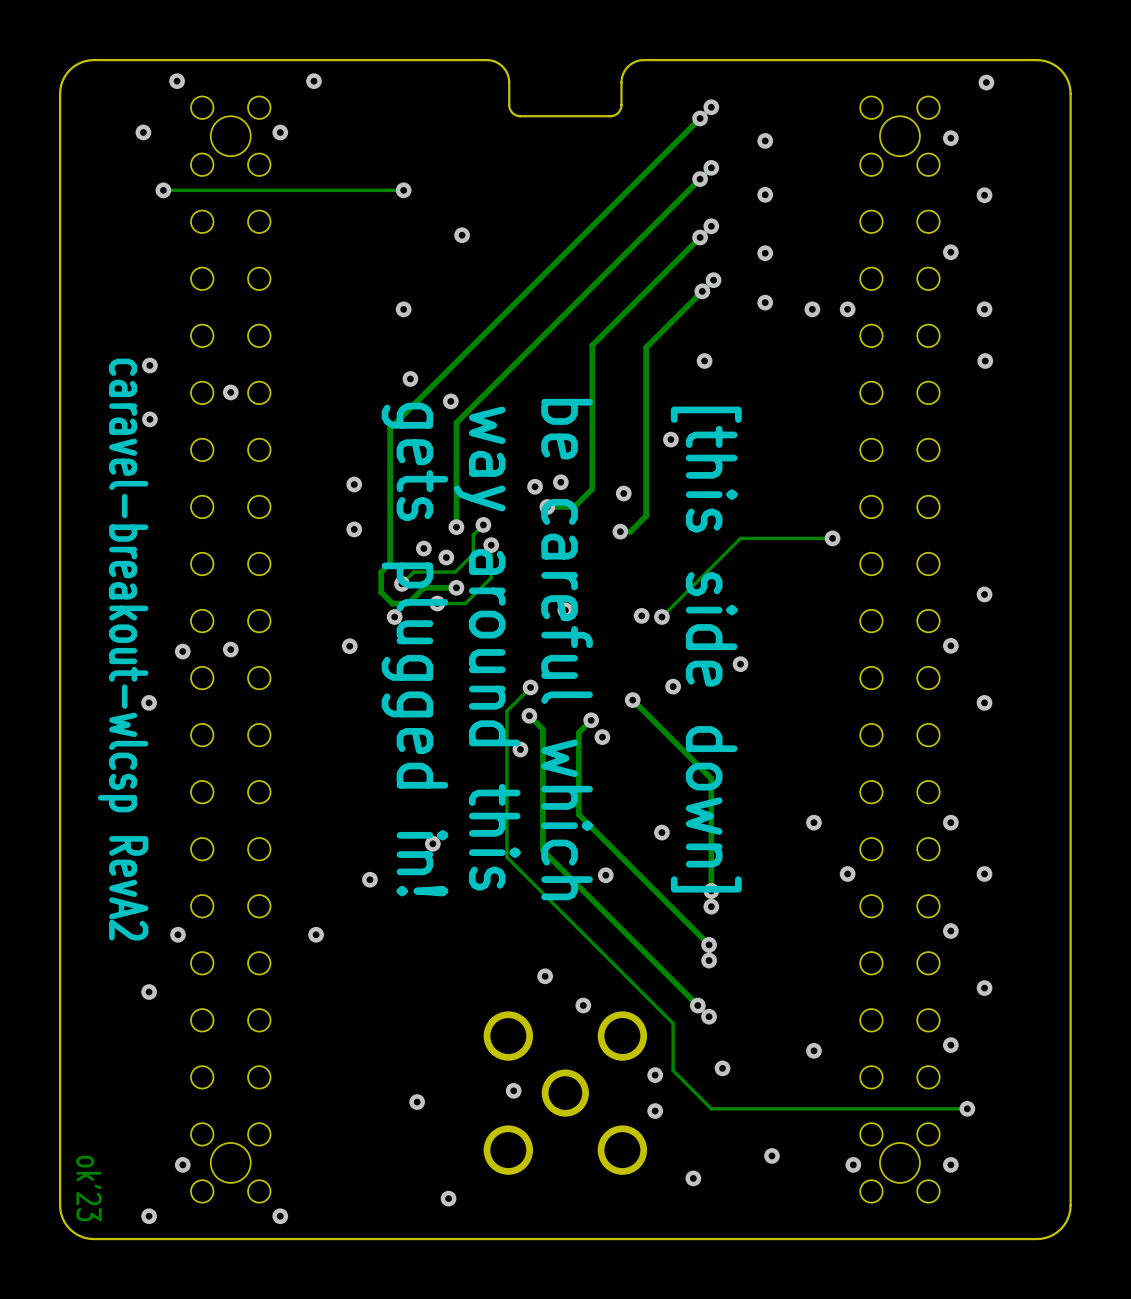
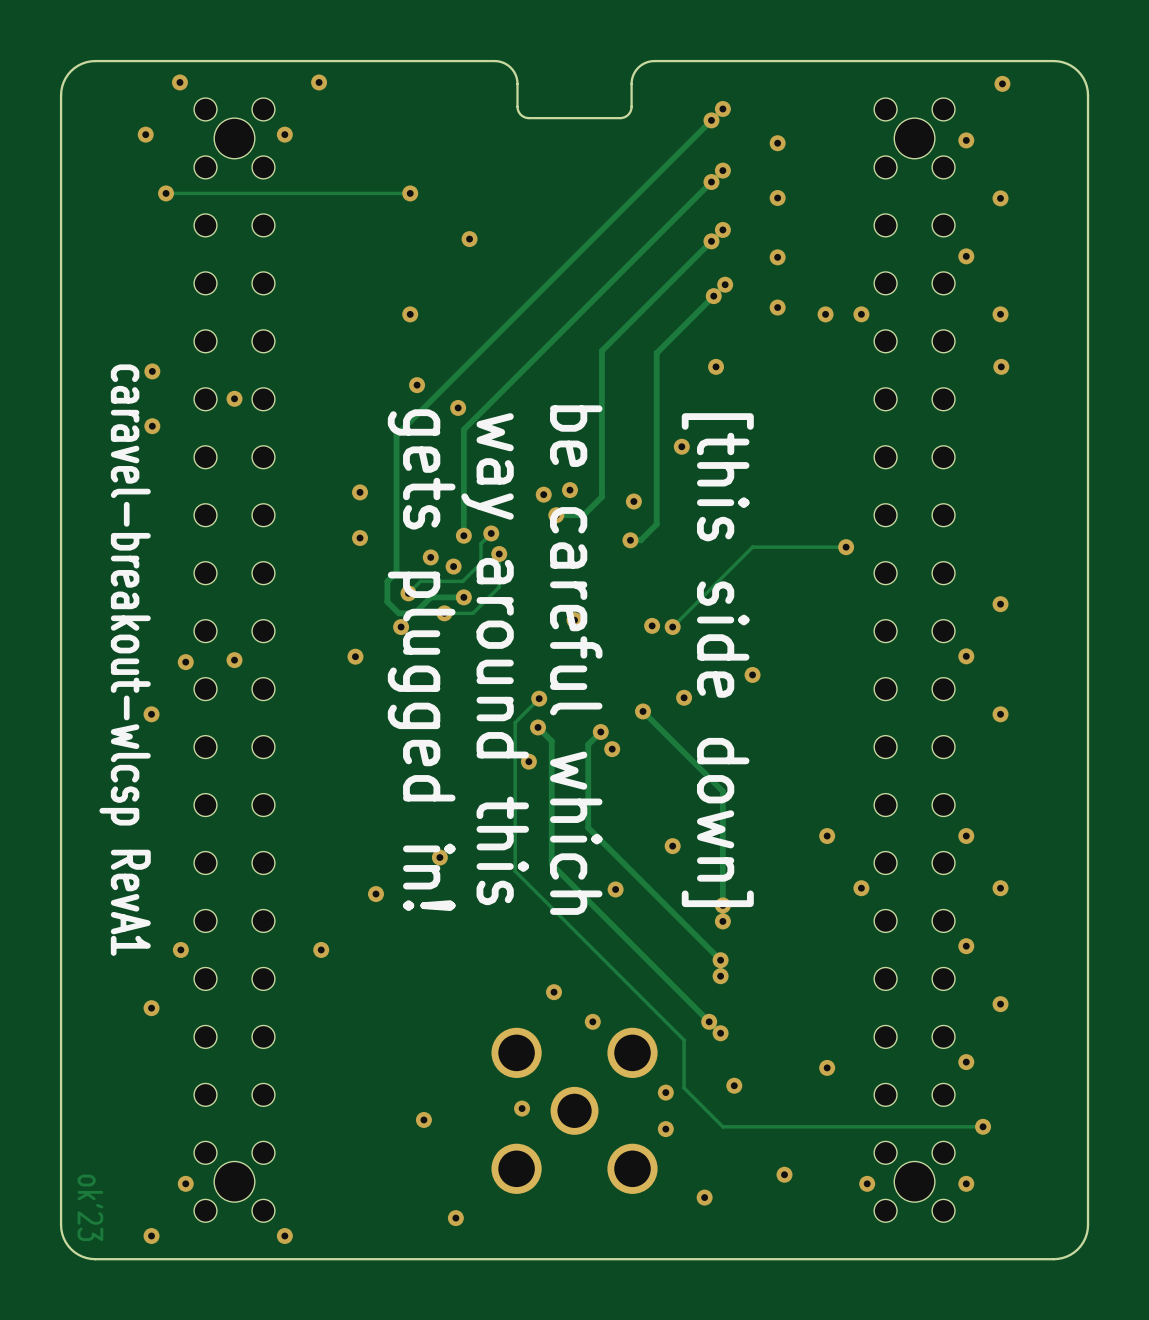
text: caravel-breakout-wlcsp RevA2 (123, 649) -> caravel-breakout-wlcsp RevA1 (125, 660)

